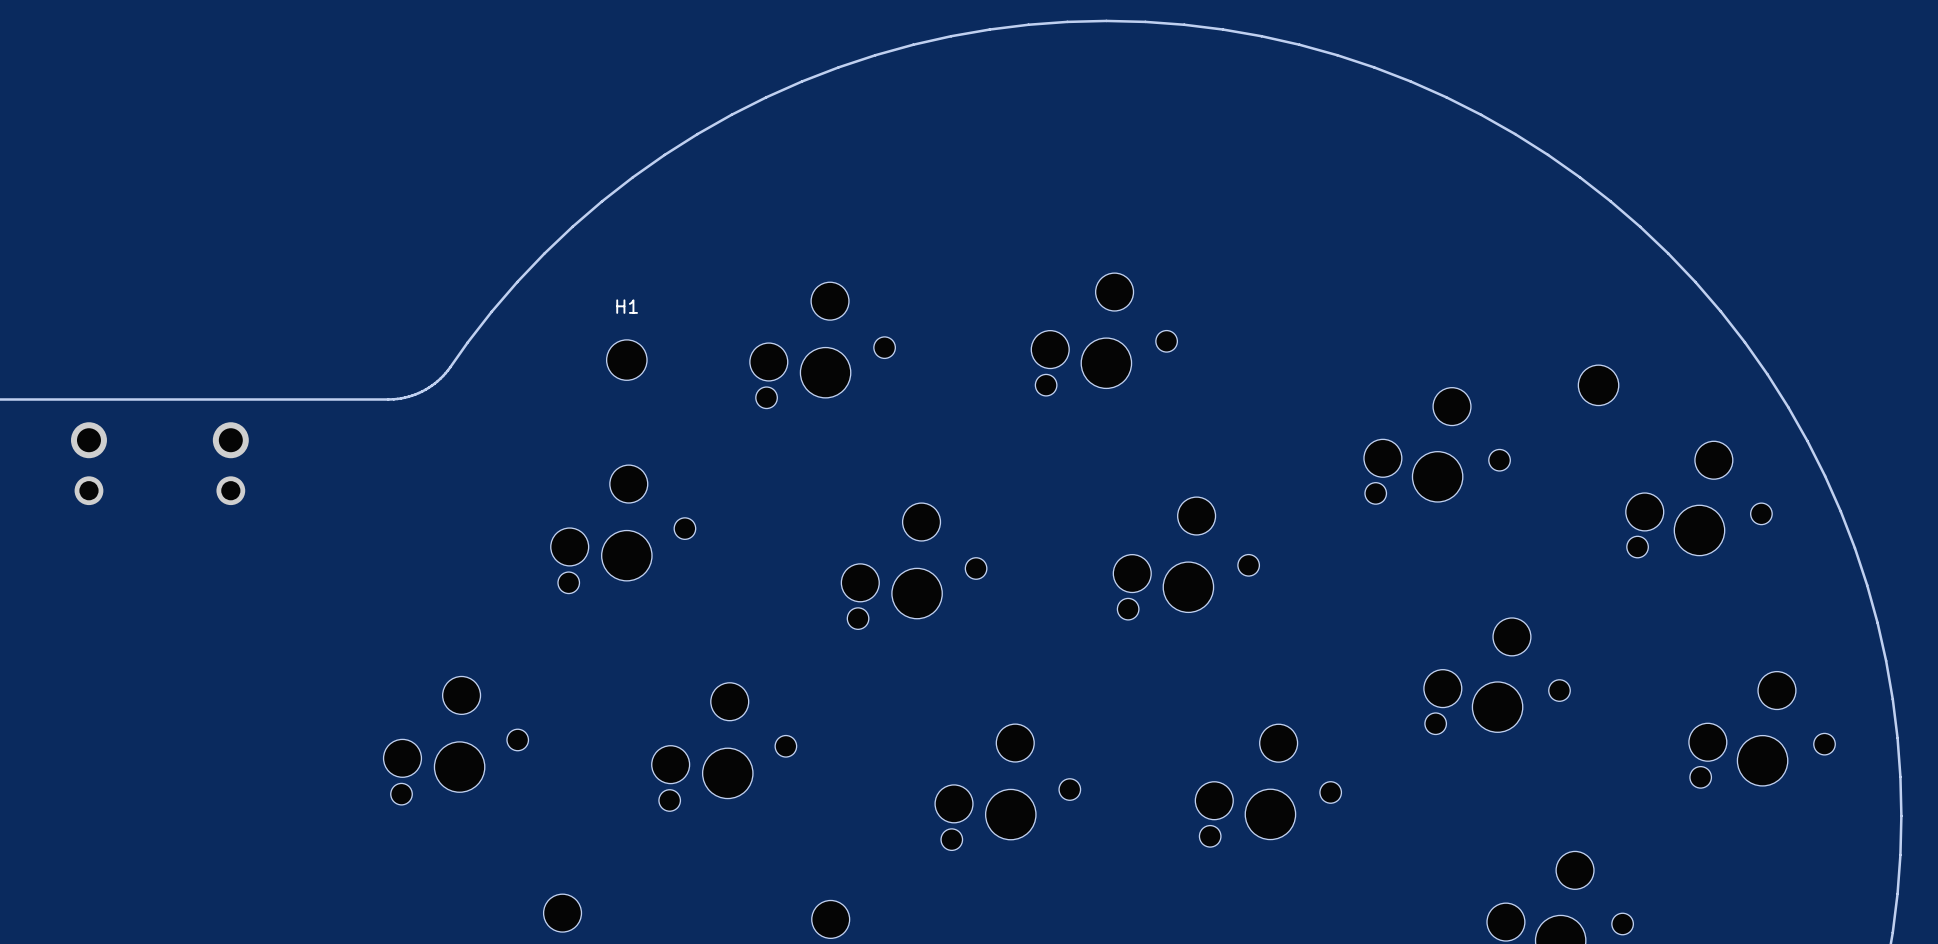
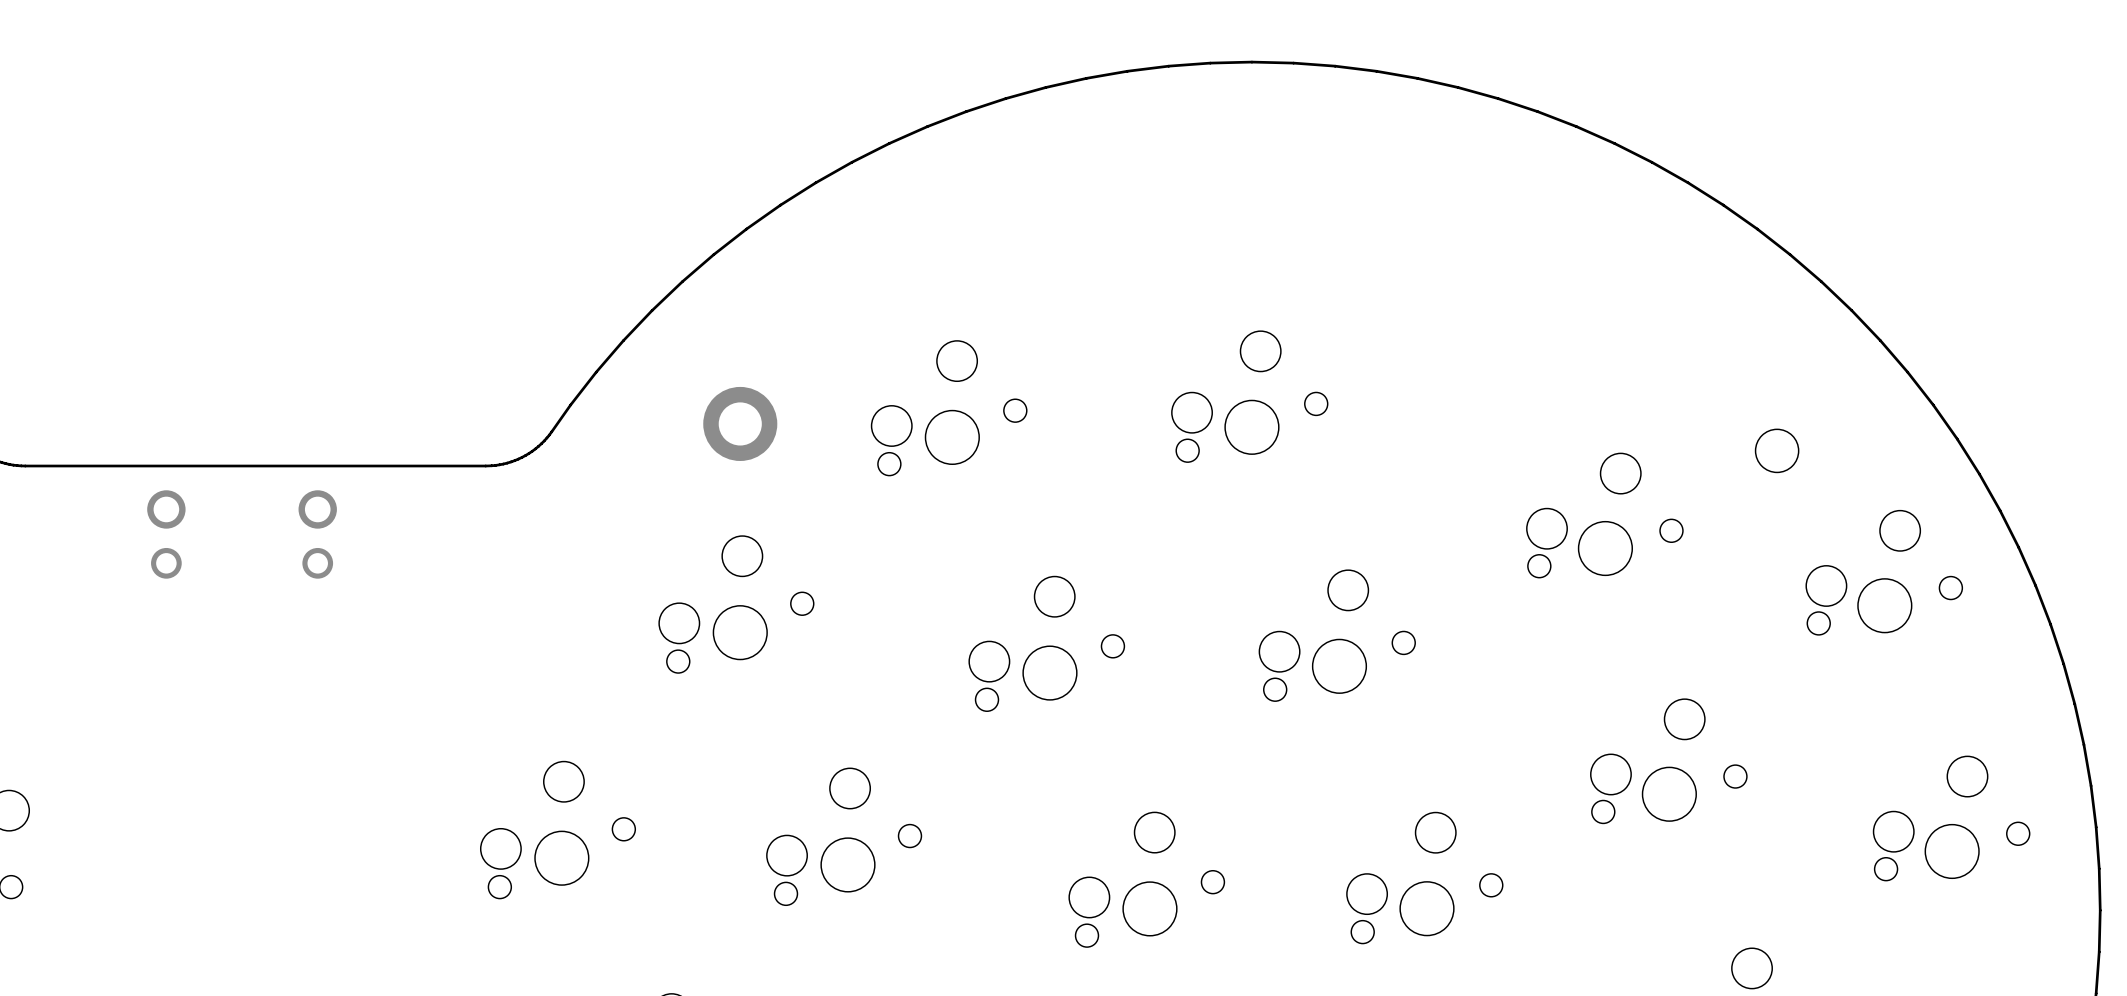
H1: (626, 360) -> none
part: none -> (740, 423)

